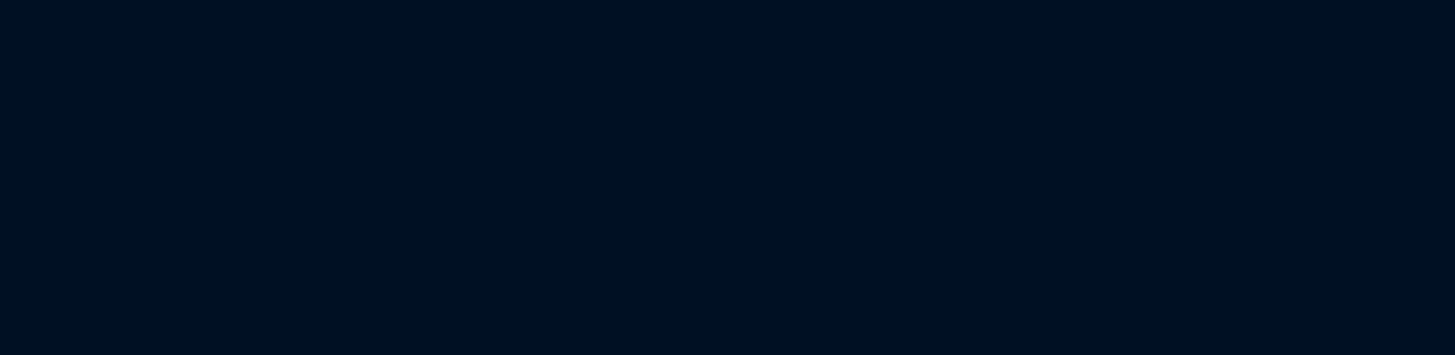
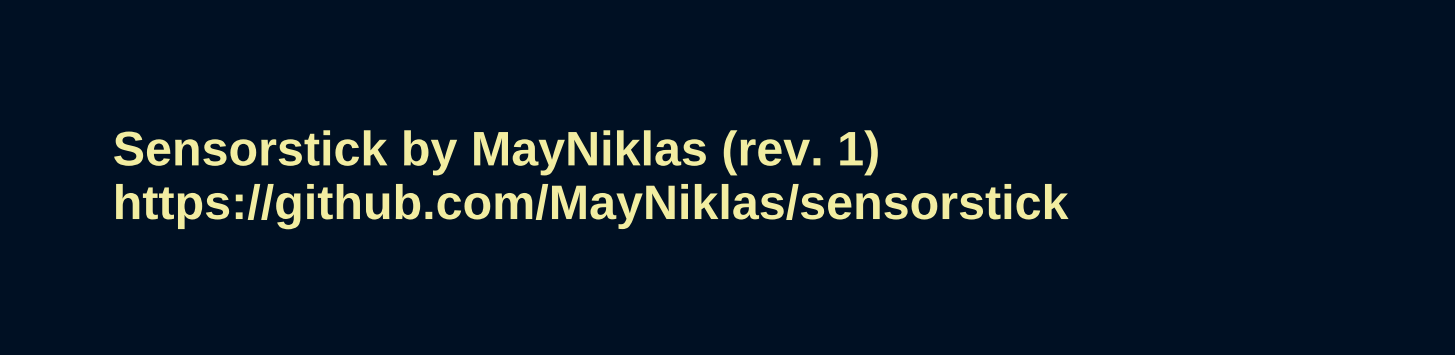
text: none -> Sensorstick by MayNiklas (rev. 1) (495, 152)
text: none -> https://github.com/MayNiklas/sensorstick (592, 206)

